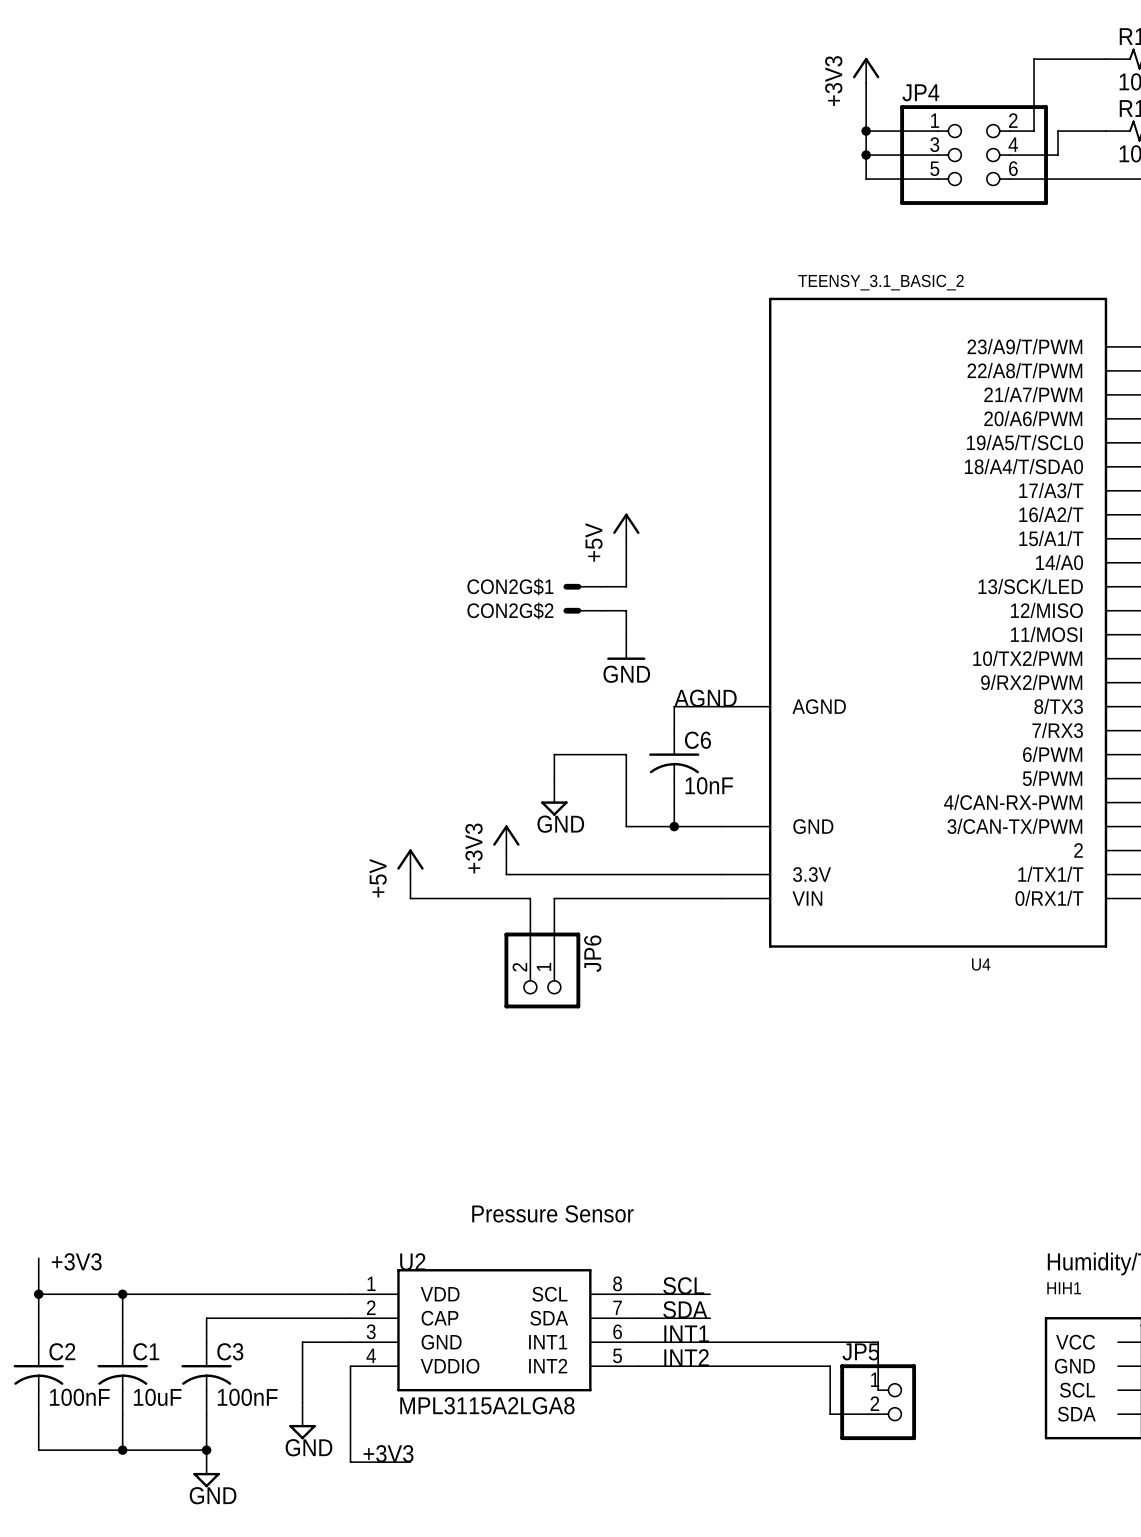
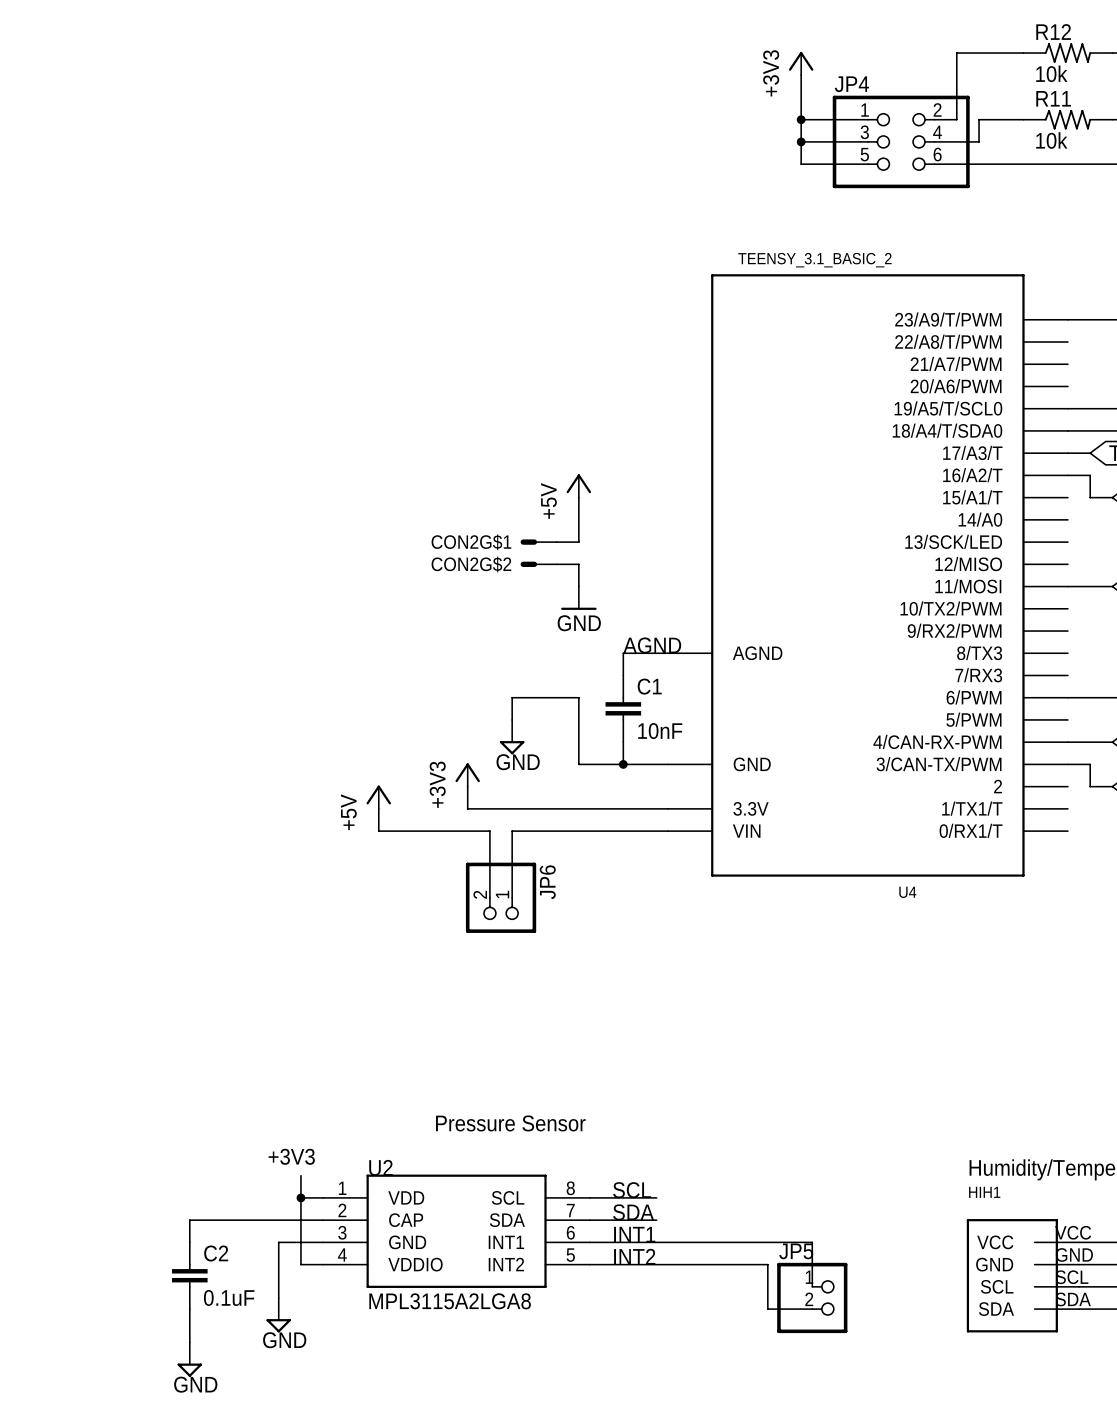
C6: 10nF (674, 766) -> none
label: none -> +3V3 (291, 1156)
wire: (38, 1258) (38, 1342) -> none
label: +3V3 (76, 1261) -> none
wire: (38, 1294) (326, 1294) -> none
junction: (38, 1294) -> none
wire: (122, 1294) (122, 1342) -> none
junction: (122, 1294) -> none
junction: none -> (300, 1197)
C2 symbol: [13, 1342, 64, 1415] -> [172, 1242, 208, 1310]
C1 symbol: [97, 1342, 148, 1415] -> [605, 675, 642, 743]
wire: (350, 1366) (350, 1462) (410, 1462) -> (323, 1264) (300, 1264) (300, 1175)
C3: 100nF (206, 1378) -> none
C2 value: 100nF (79, 1397) -> 0.1uF (229, 1297)
C1 value: 10uF (157, 1397) -> 10nF (660, 731)
wire: (38, 1414) (38, 1450) (206, 1450) -> none
wire: (122, 1414) (122, 1450) -> none
junction: (122, 1450) -> none
junction: (206, 1450) -> none
label: +3V3 (388, 1453) -> none

